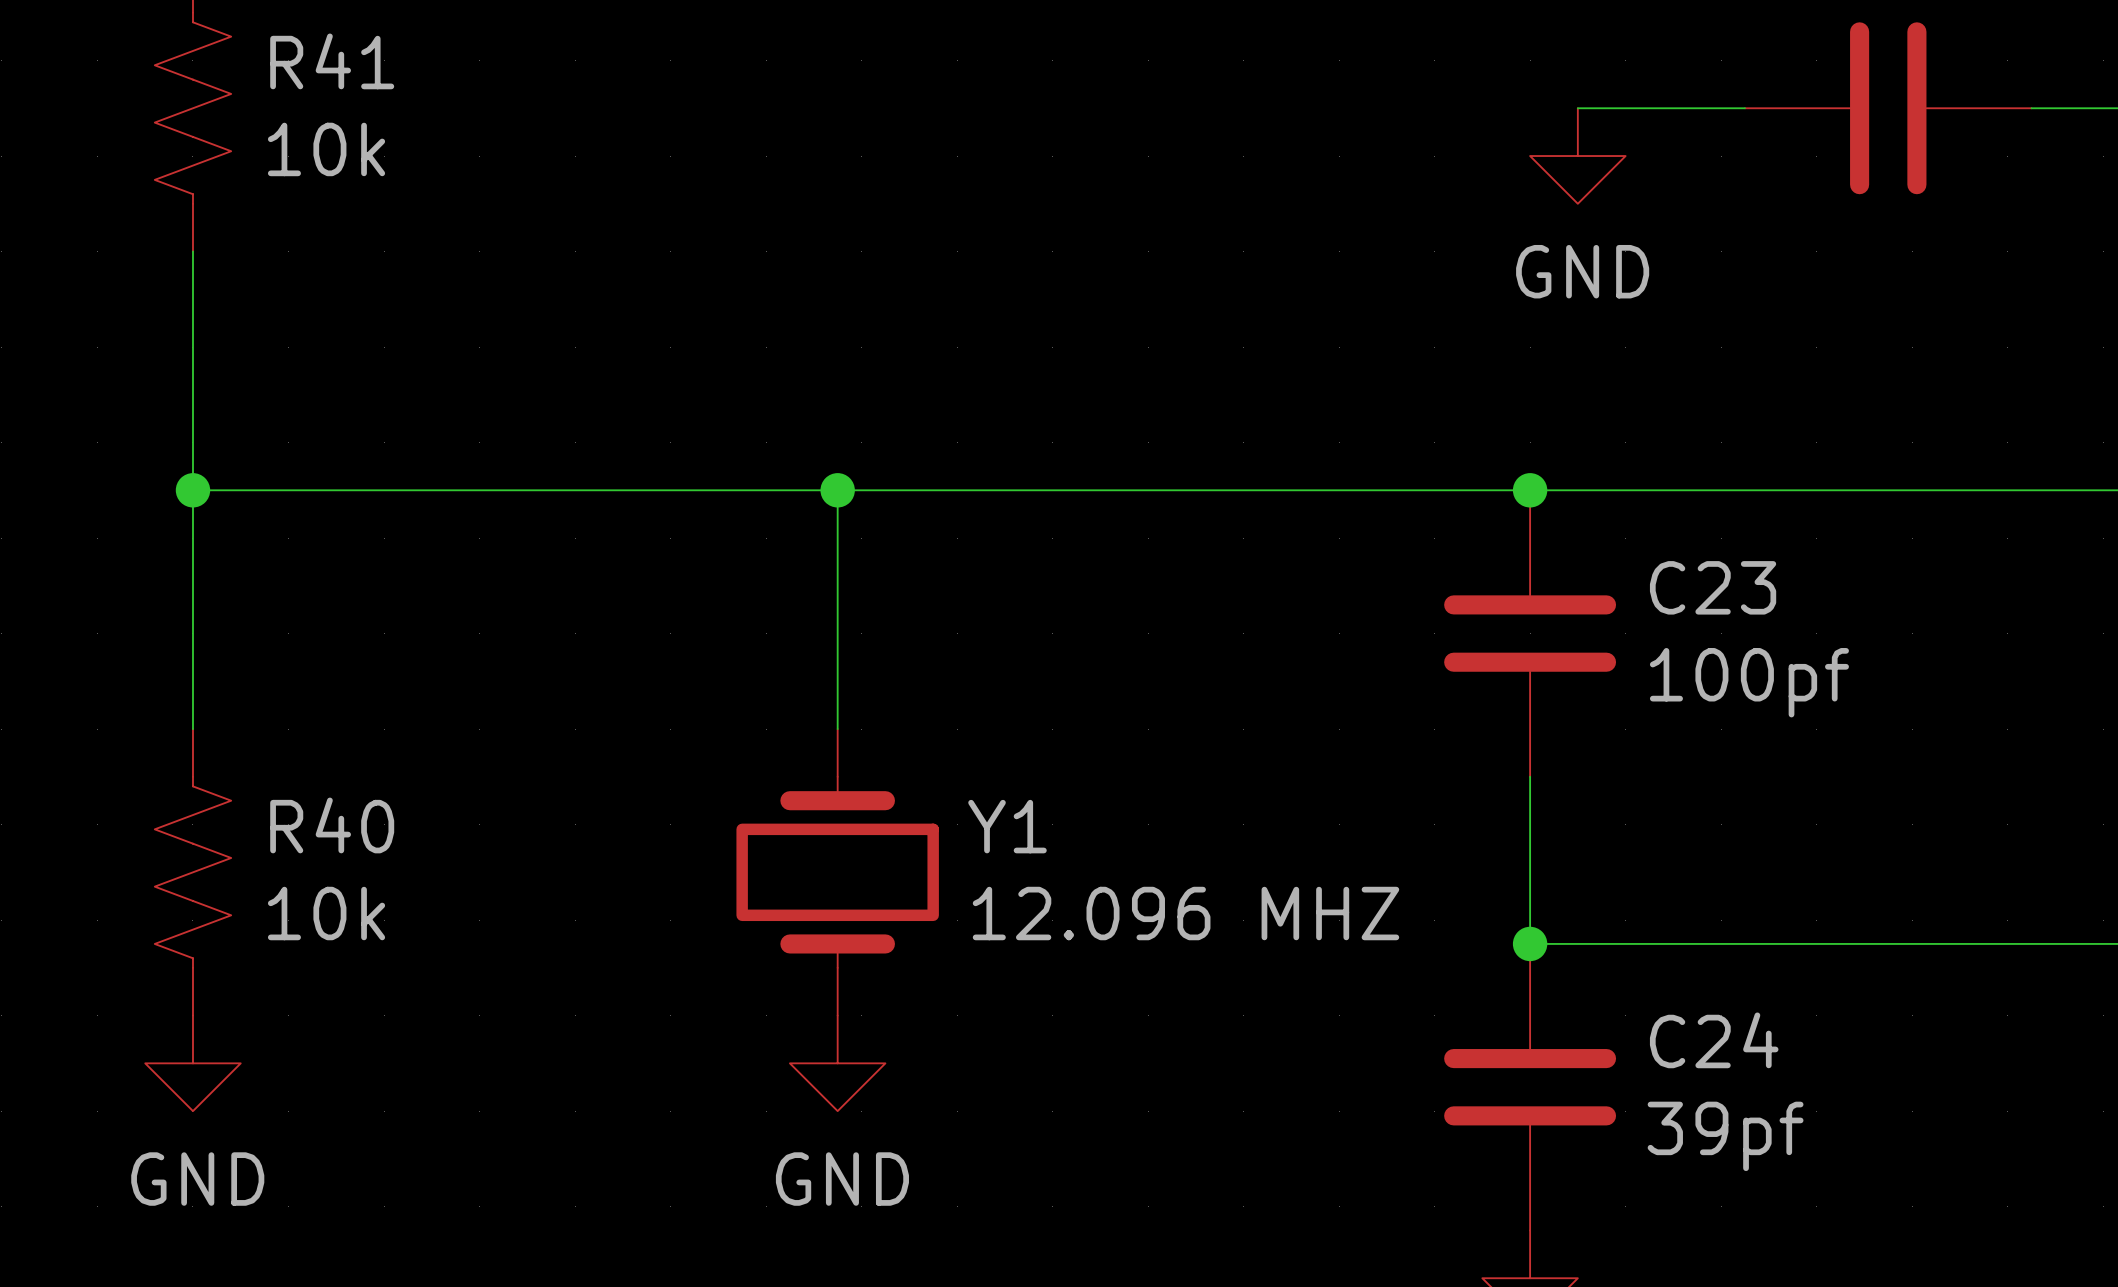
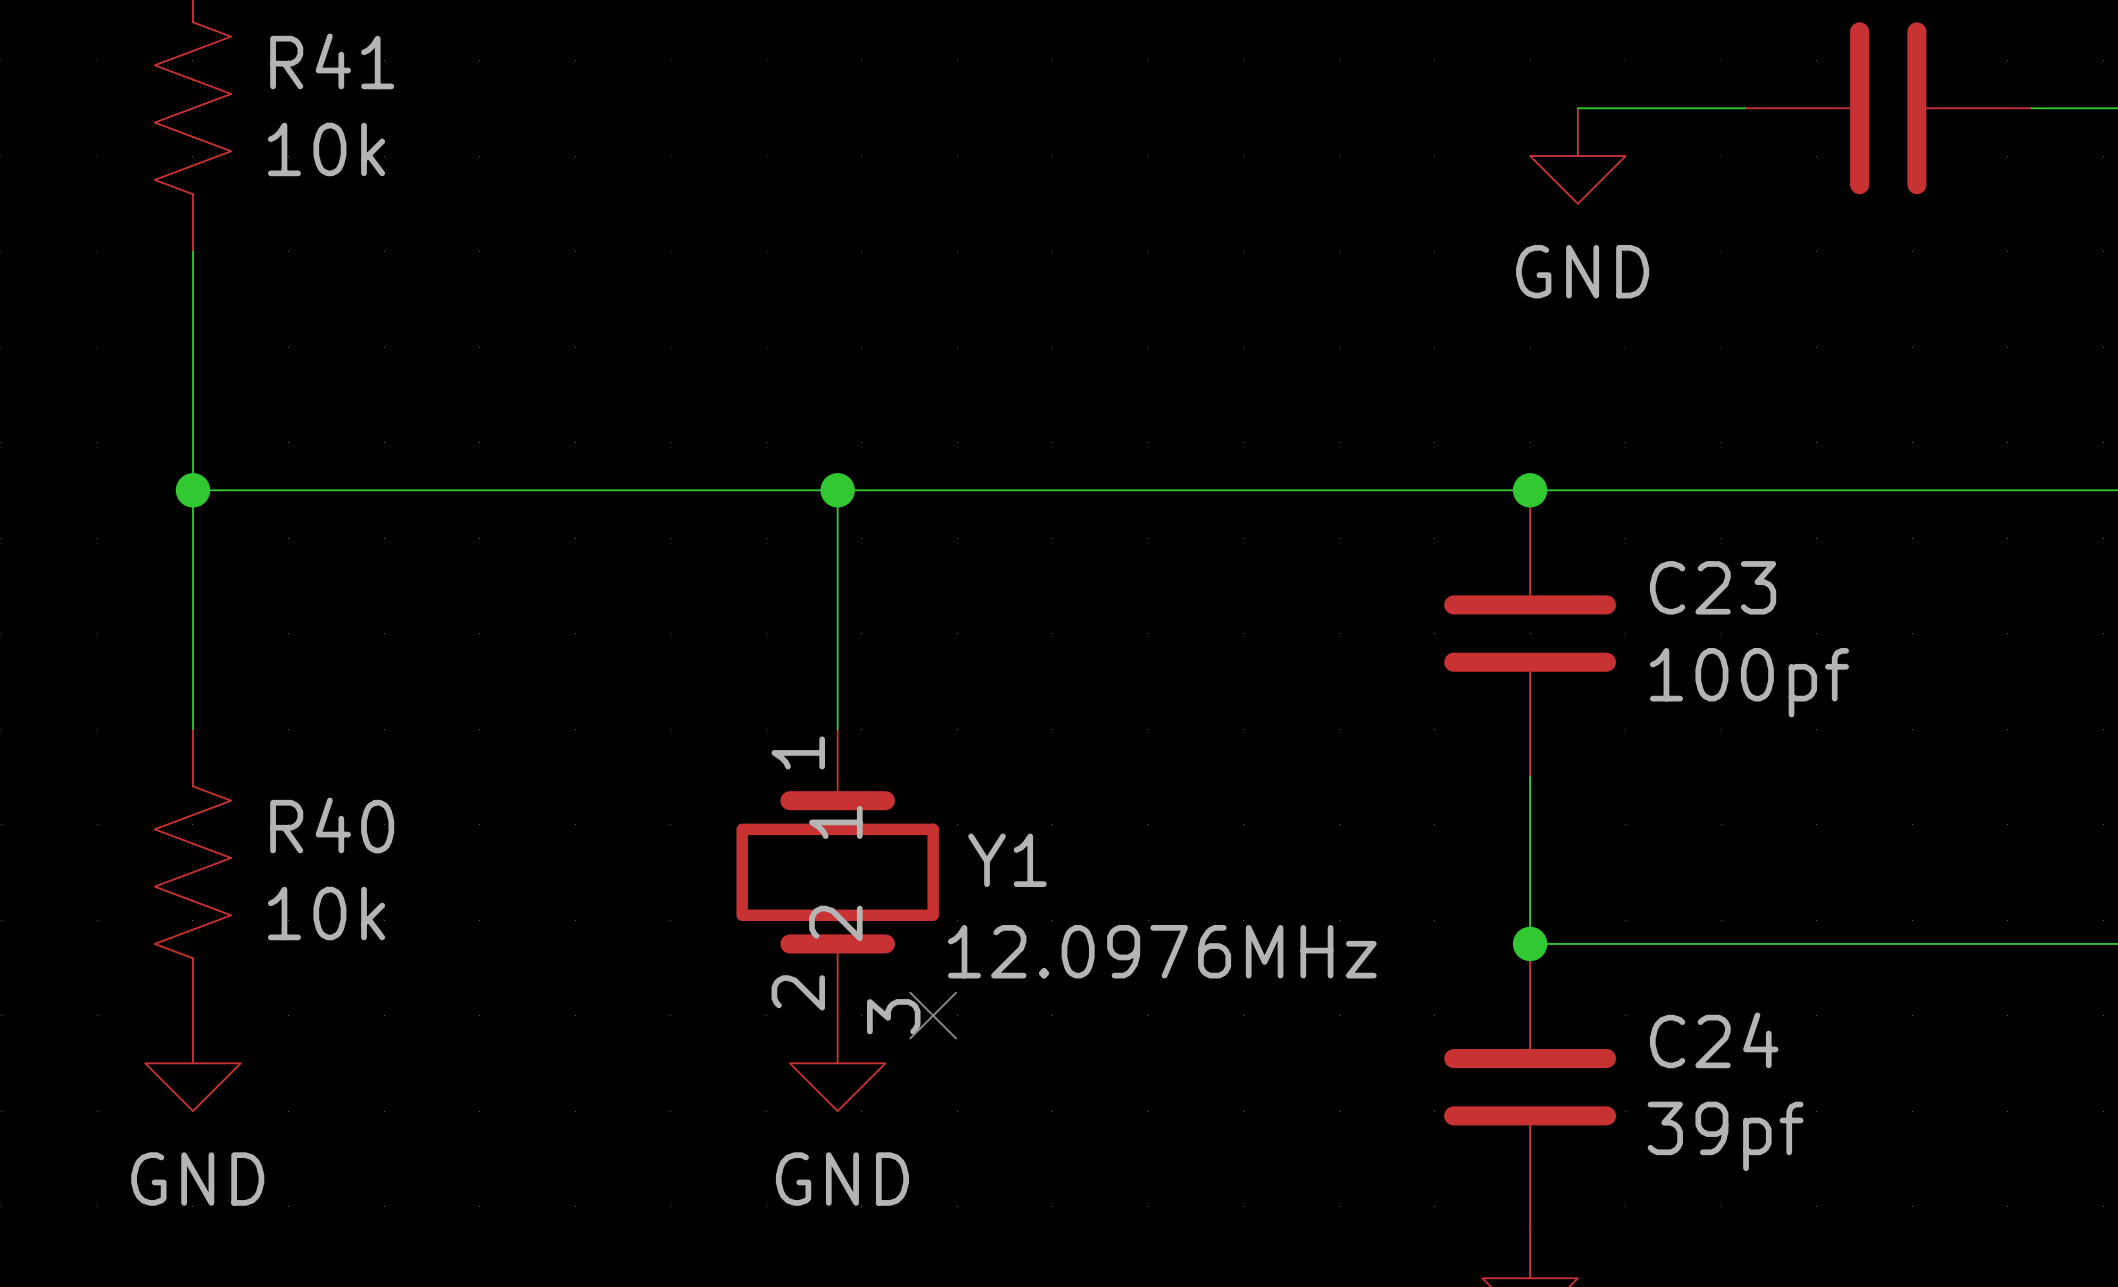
Y1 pin number: none -> 1 (798, 752)
Y1 pin name: none -> 1 (835, 822)
Y1 name position: Y1 (1007, 826) -> Y1 (1007, 860)
Y1 value: 12.096 MHZ (1185, 913) -> 12.0976MHz (1162, 951)
Y1 pin name: none -> 2 (835, 923)
Y1 pin number: none -> 2 (798, 992)
no-connect mark: none -> (933, 1015)
Y1 pin number: none -> 3 (893, 1016)

